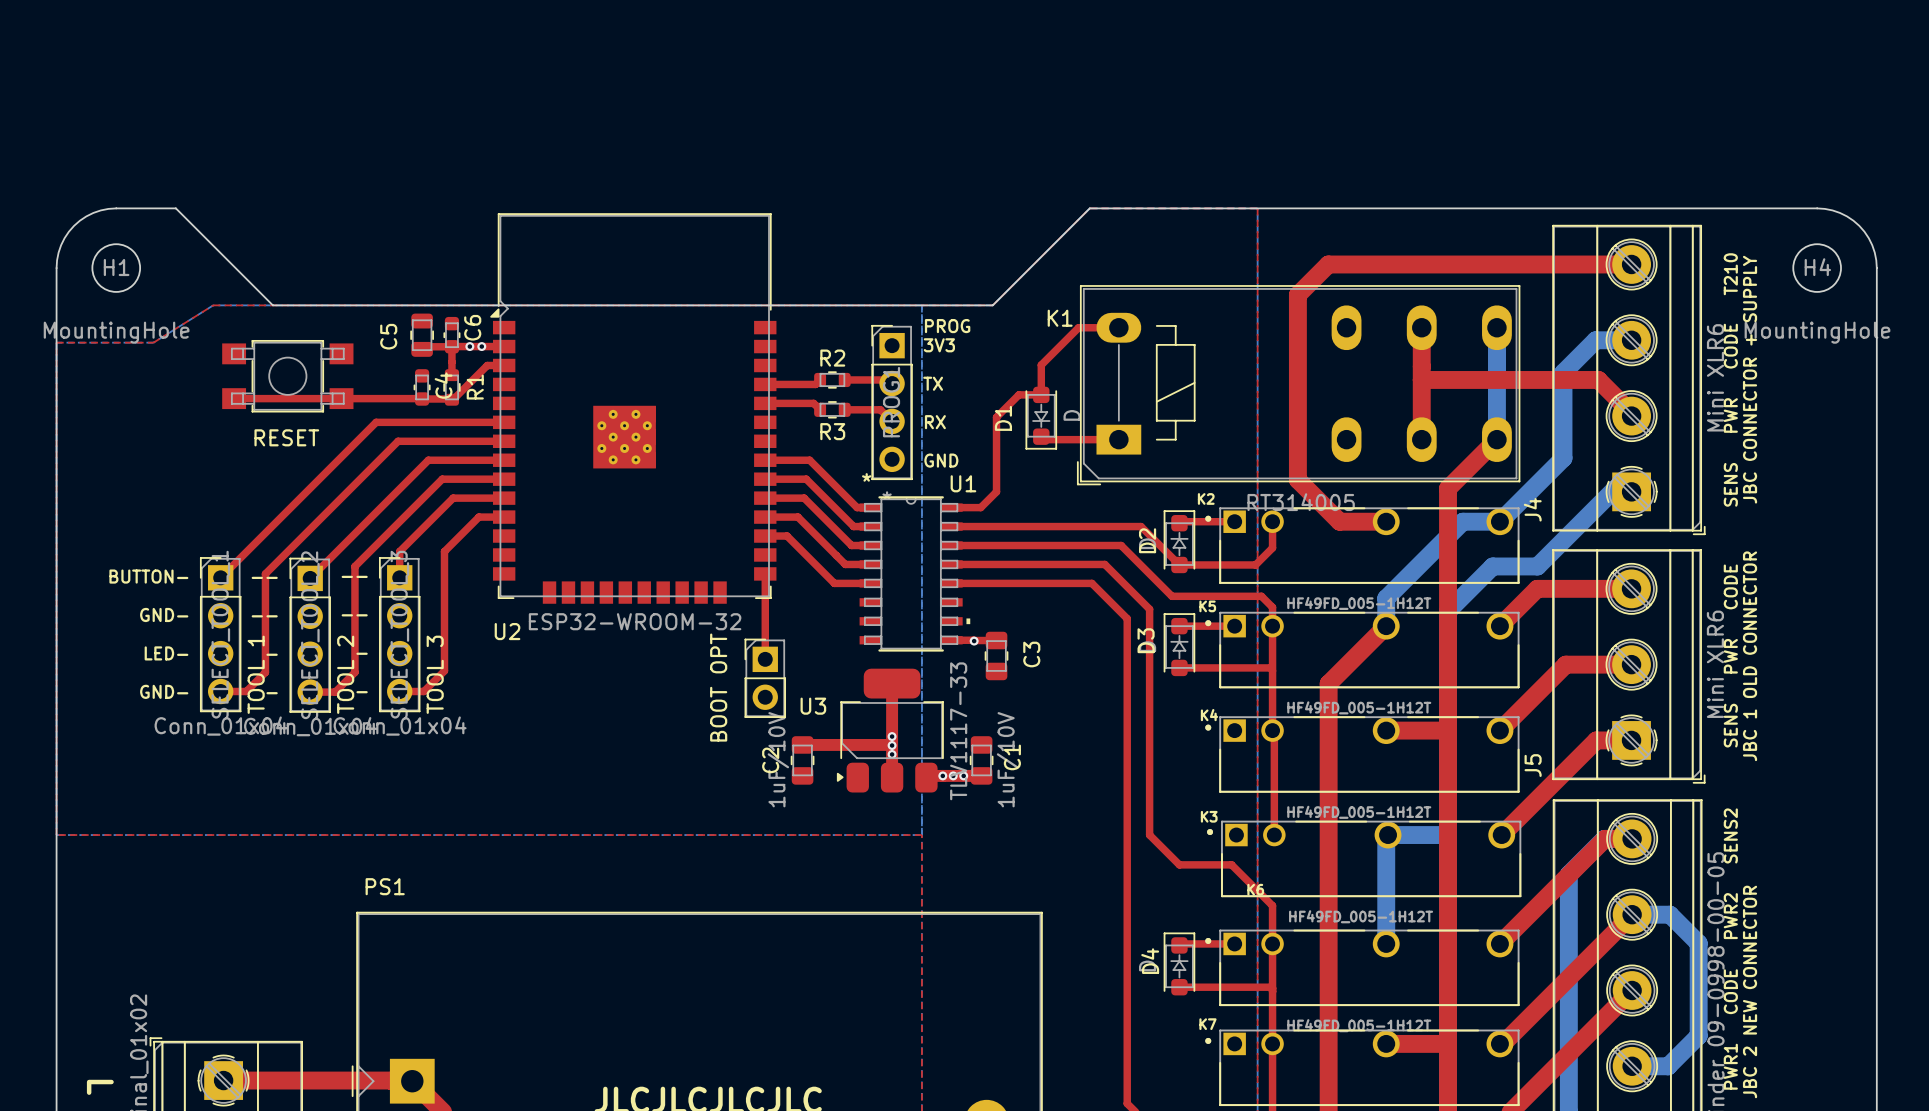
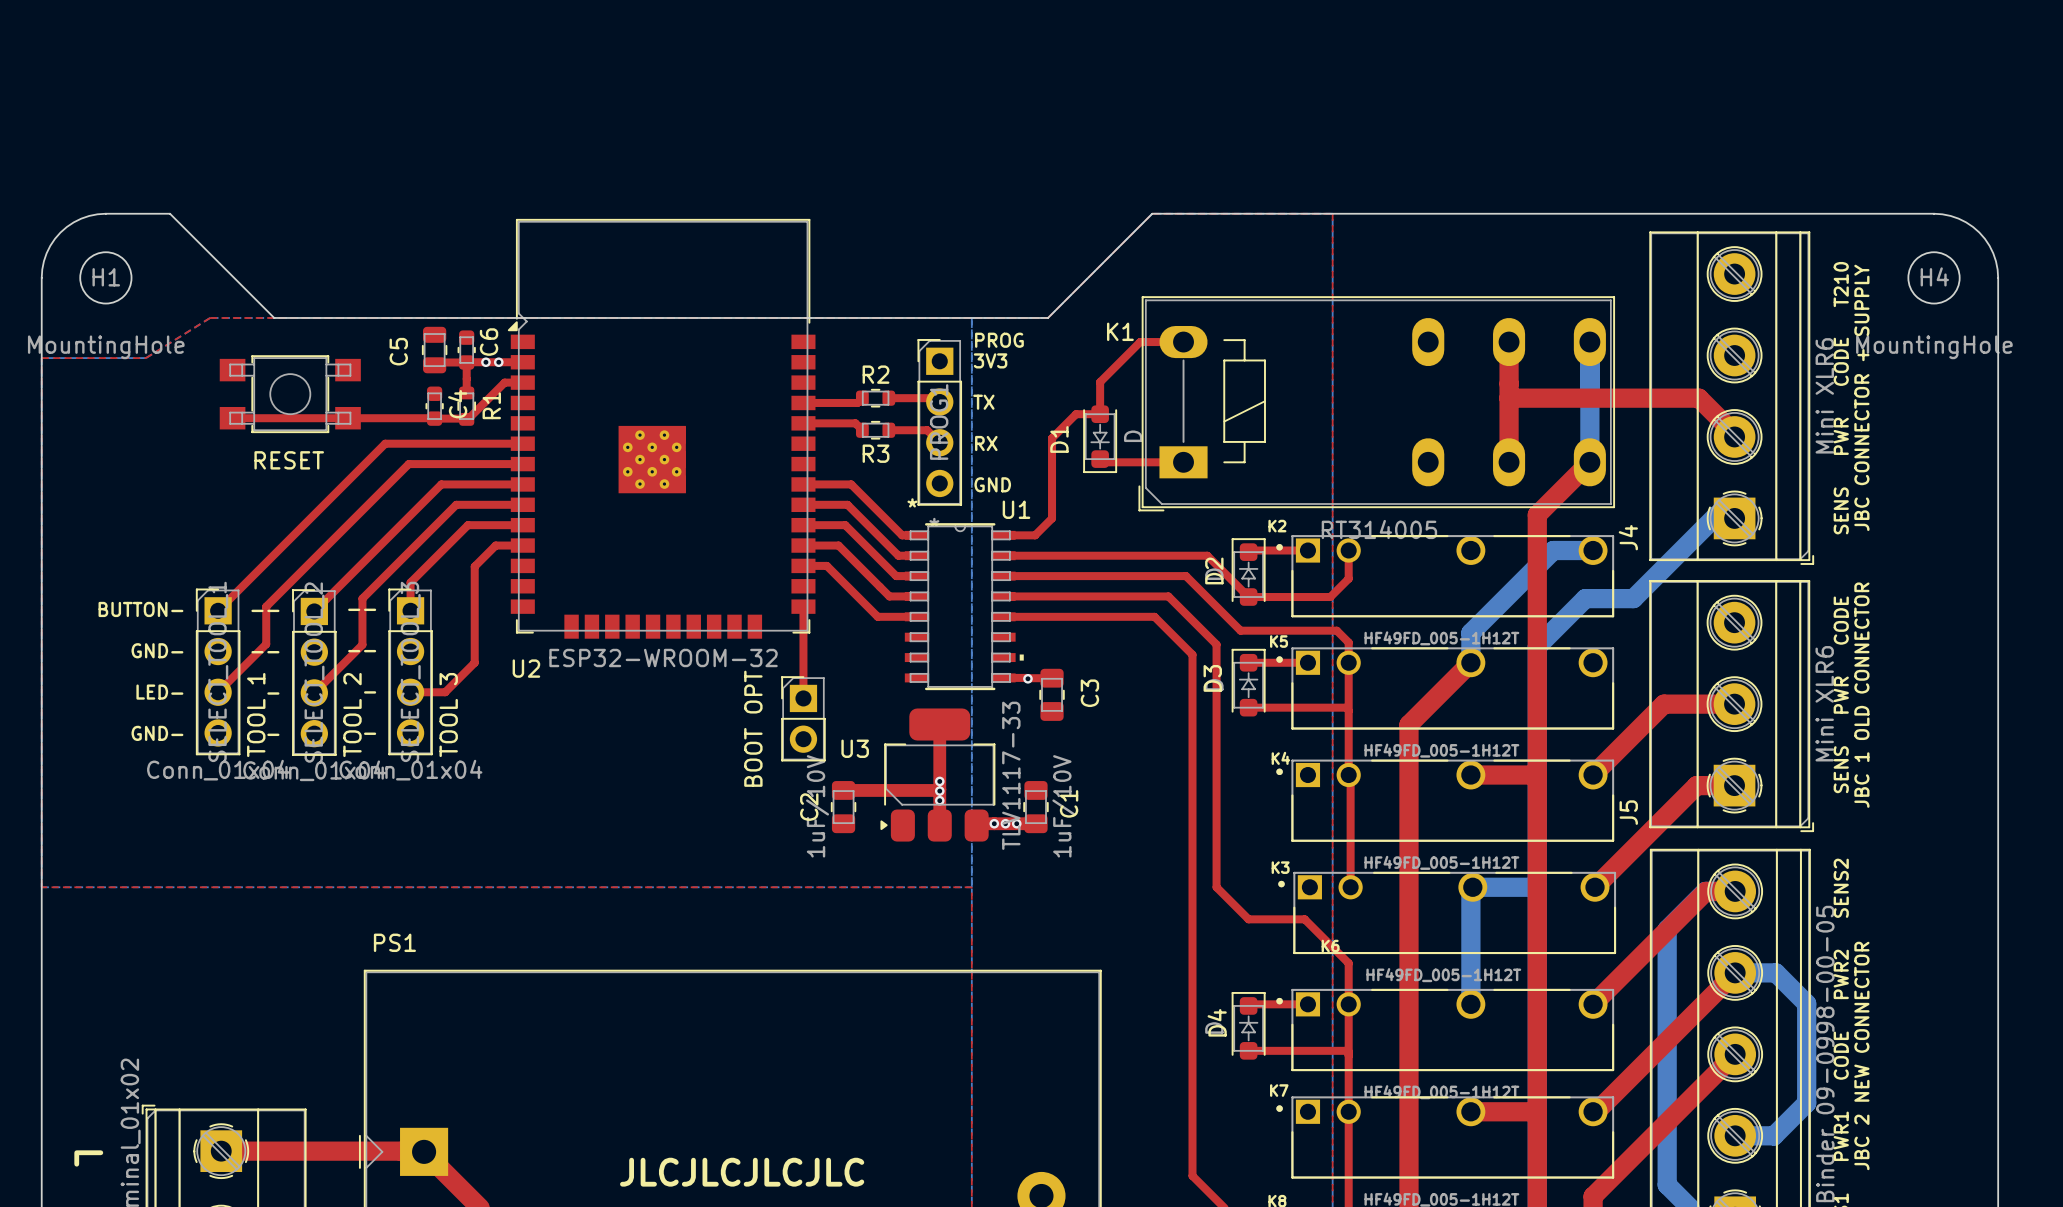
top track: (1631, 264) (1328, 264) (1297, 294) (1297, 479) (1339, 521) (1386, 521) -> none
bottom track: (1631, 340) (1595, 340) (1563, 372) (1563, 458) (1499, 521) -> none
top track: (459, 536) (444, 551) (444, 670) (423, 691) (399, 691) -> (474, 566) (474, 662) (445, 692) (410, 692)
top track: (1631, 588) (1537, 588) (1499, 626) -> none
top track: (265, 608) (265, 672) (246, 691) (220, 691) -> (266, 644) (218, 692)
top track: (354, 609) (354, 672) (335, 692) (310, 692) -> (362, 644) (314, 692)

